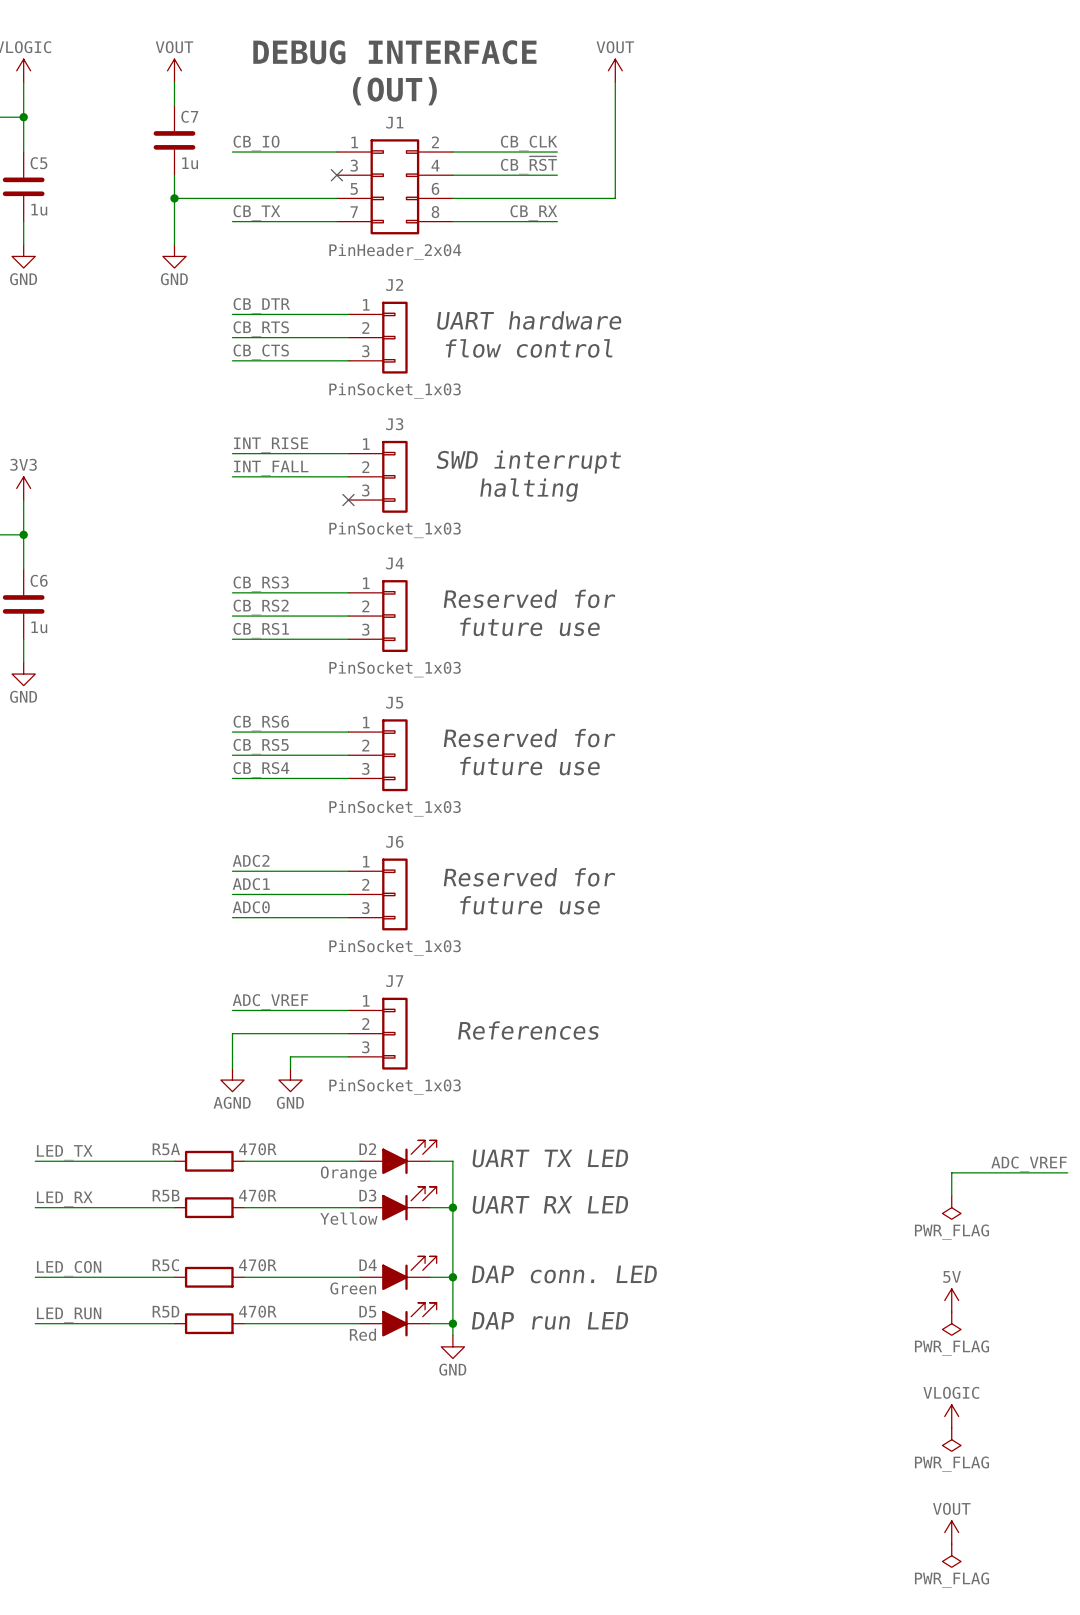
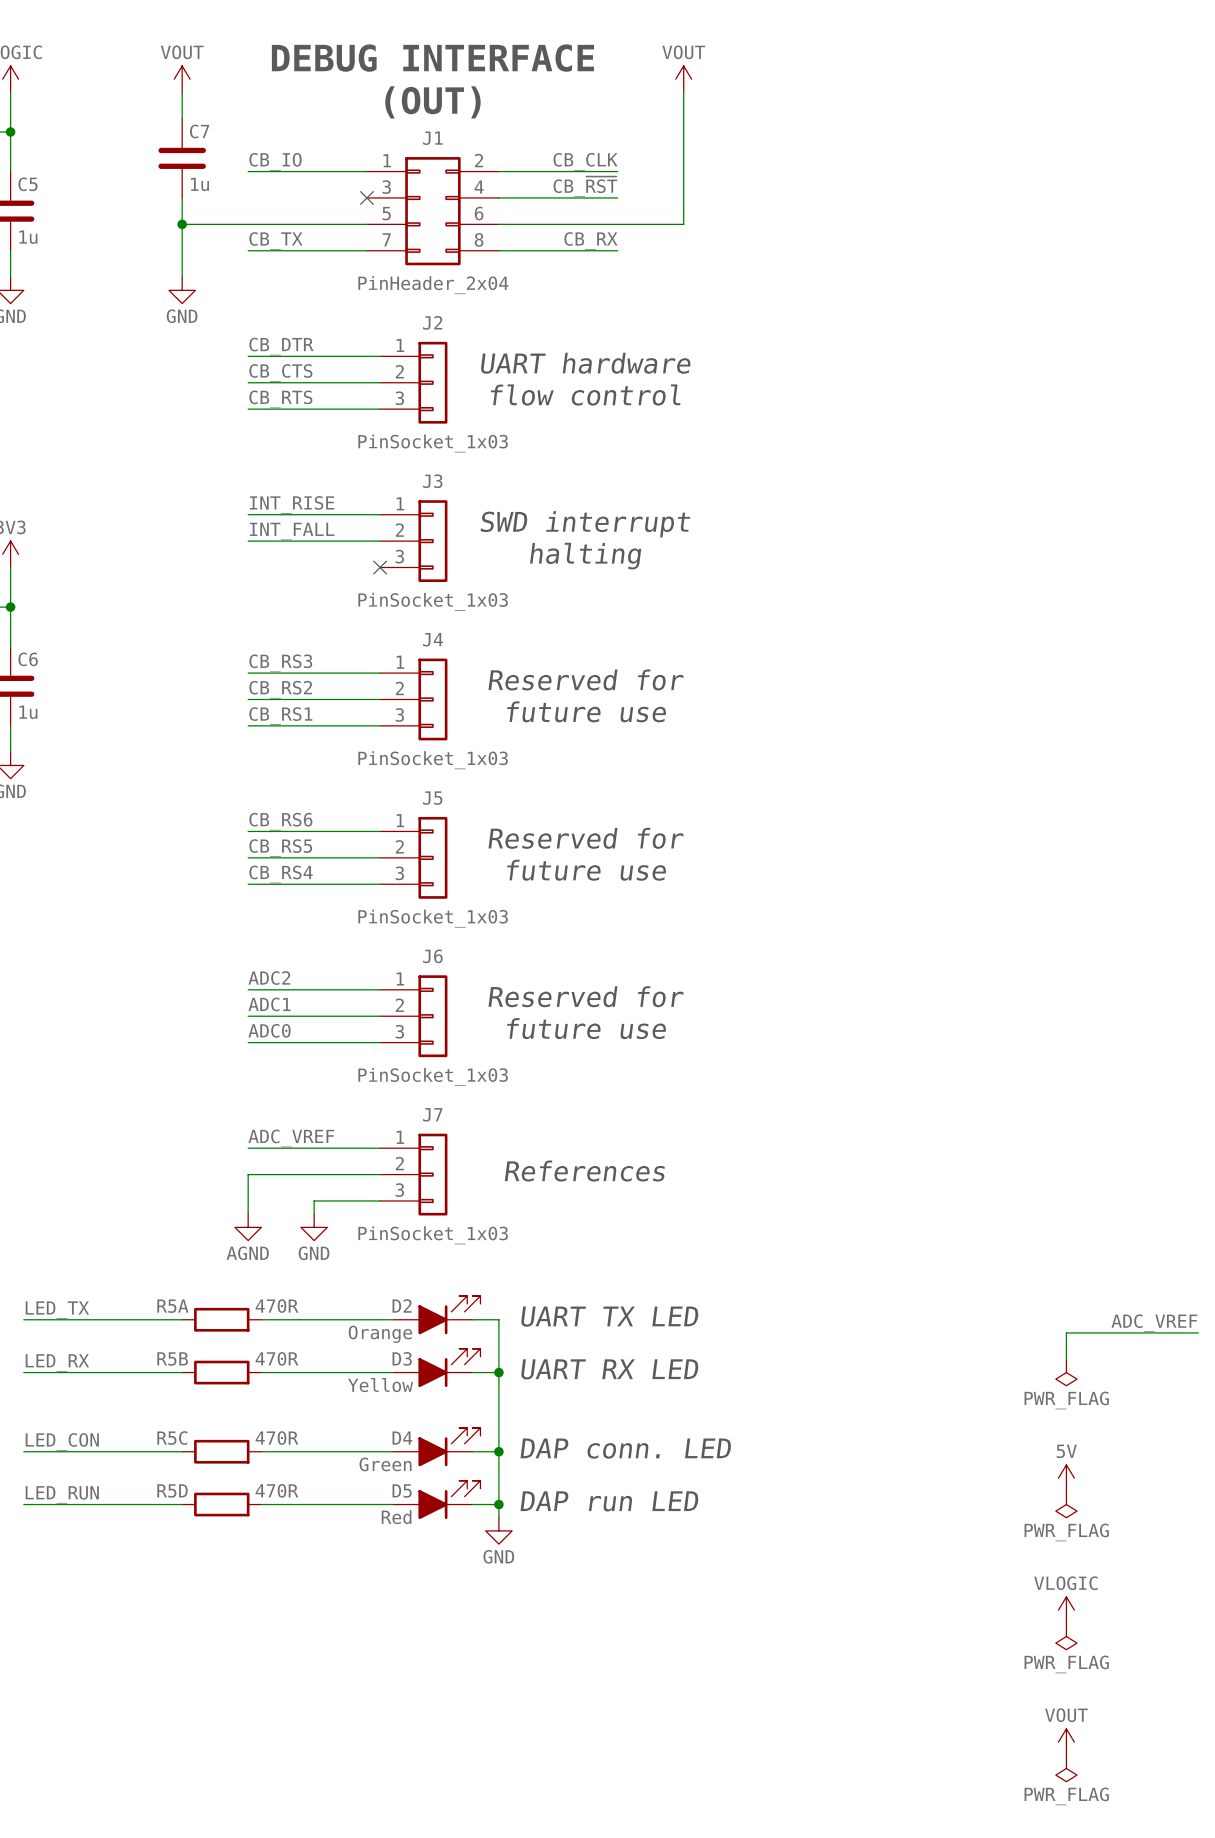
label: CB_RTS (261, 329) -> CB_CTS (280, 372)
label: CB_CTS (261, 352) -> CB_RTS (280, 399)

